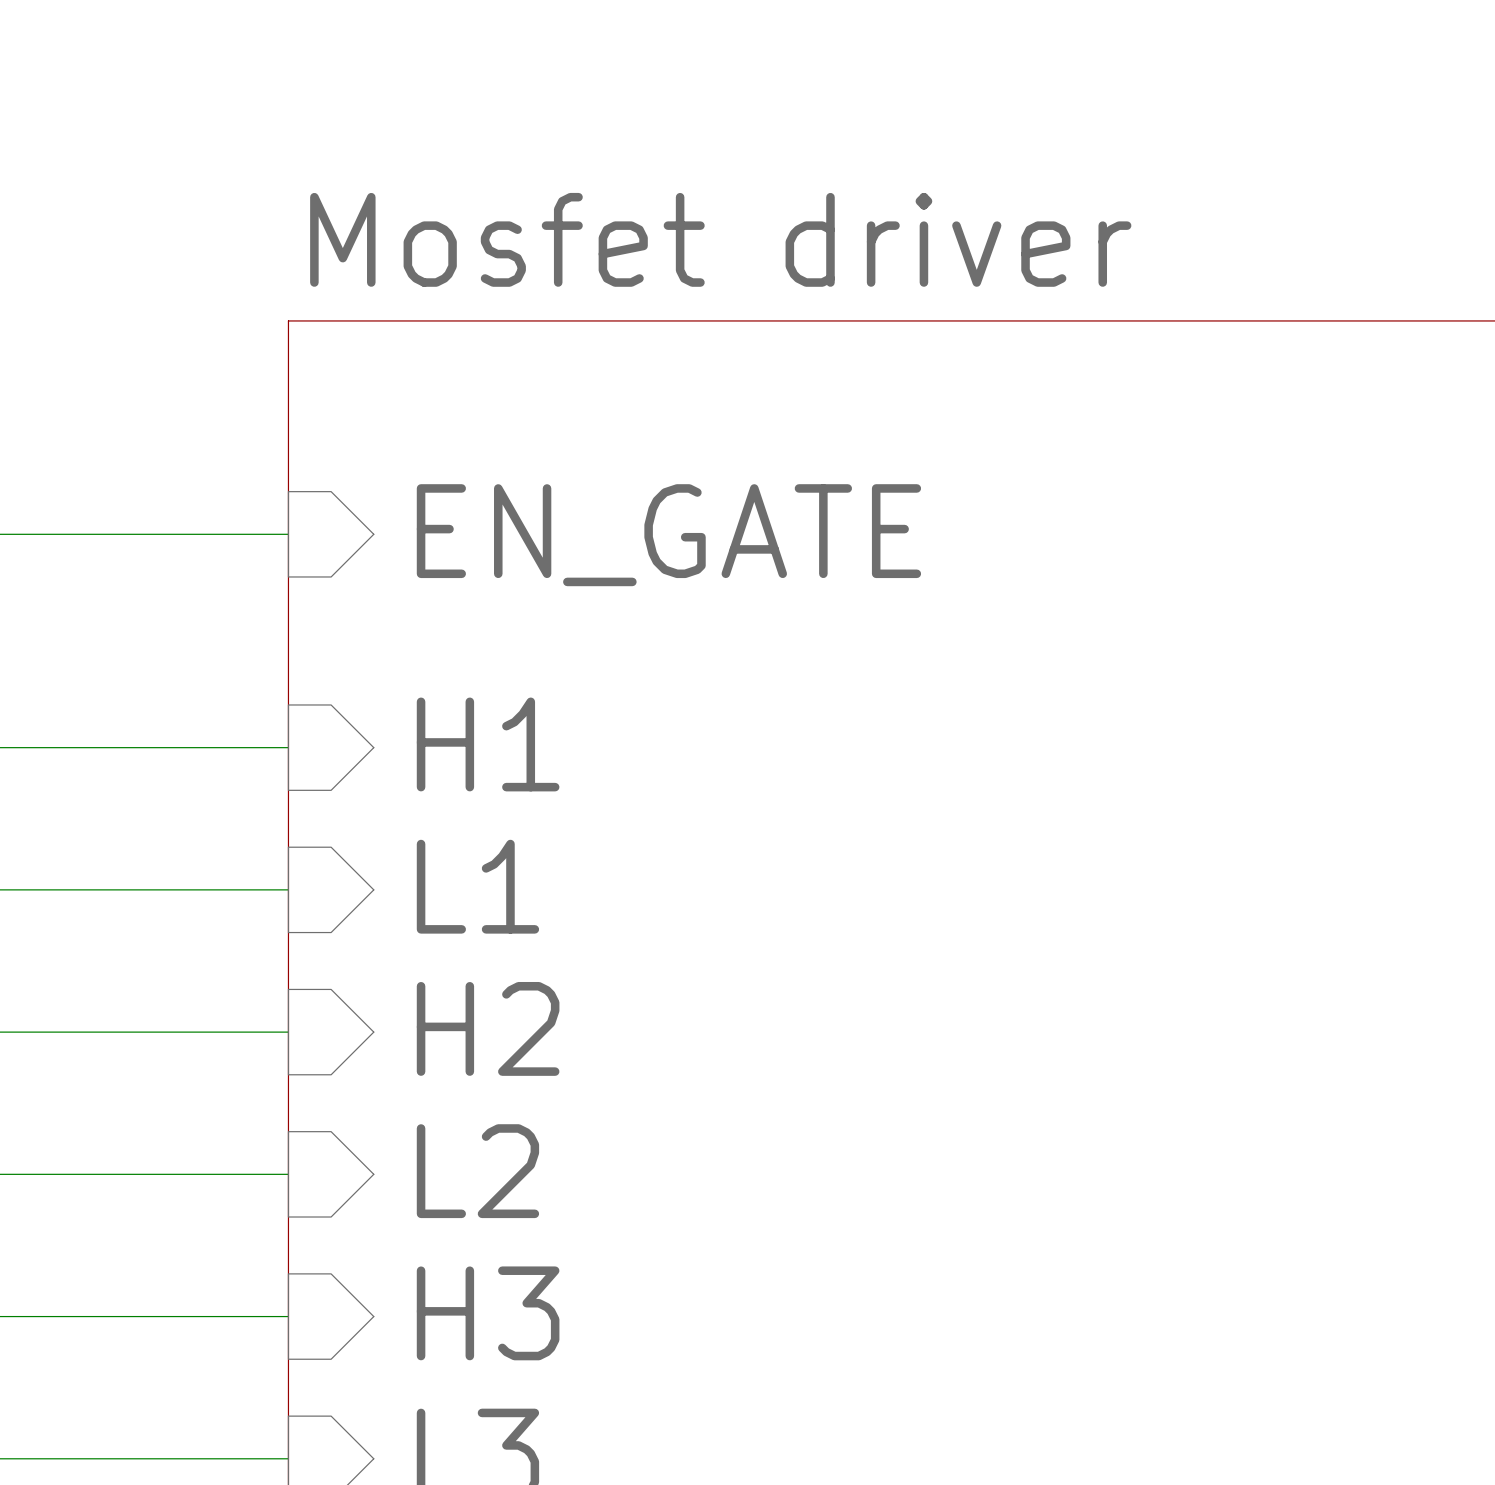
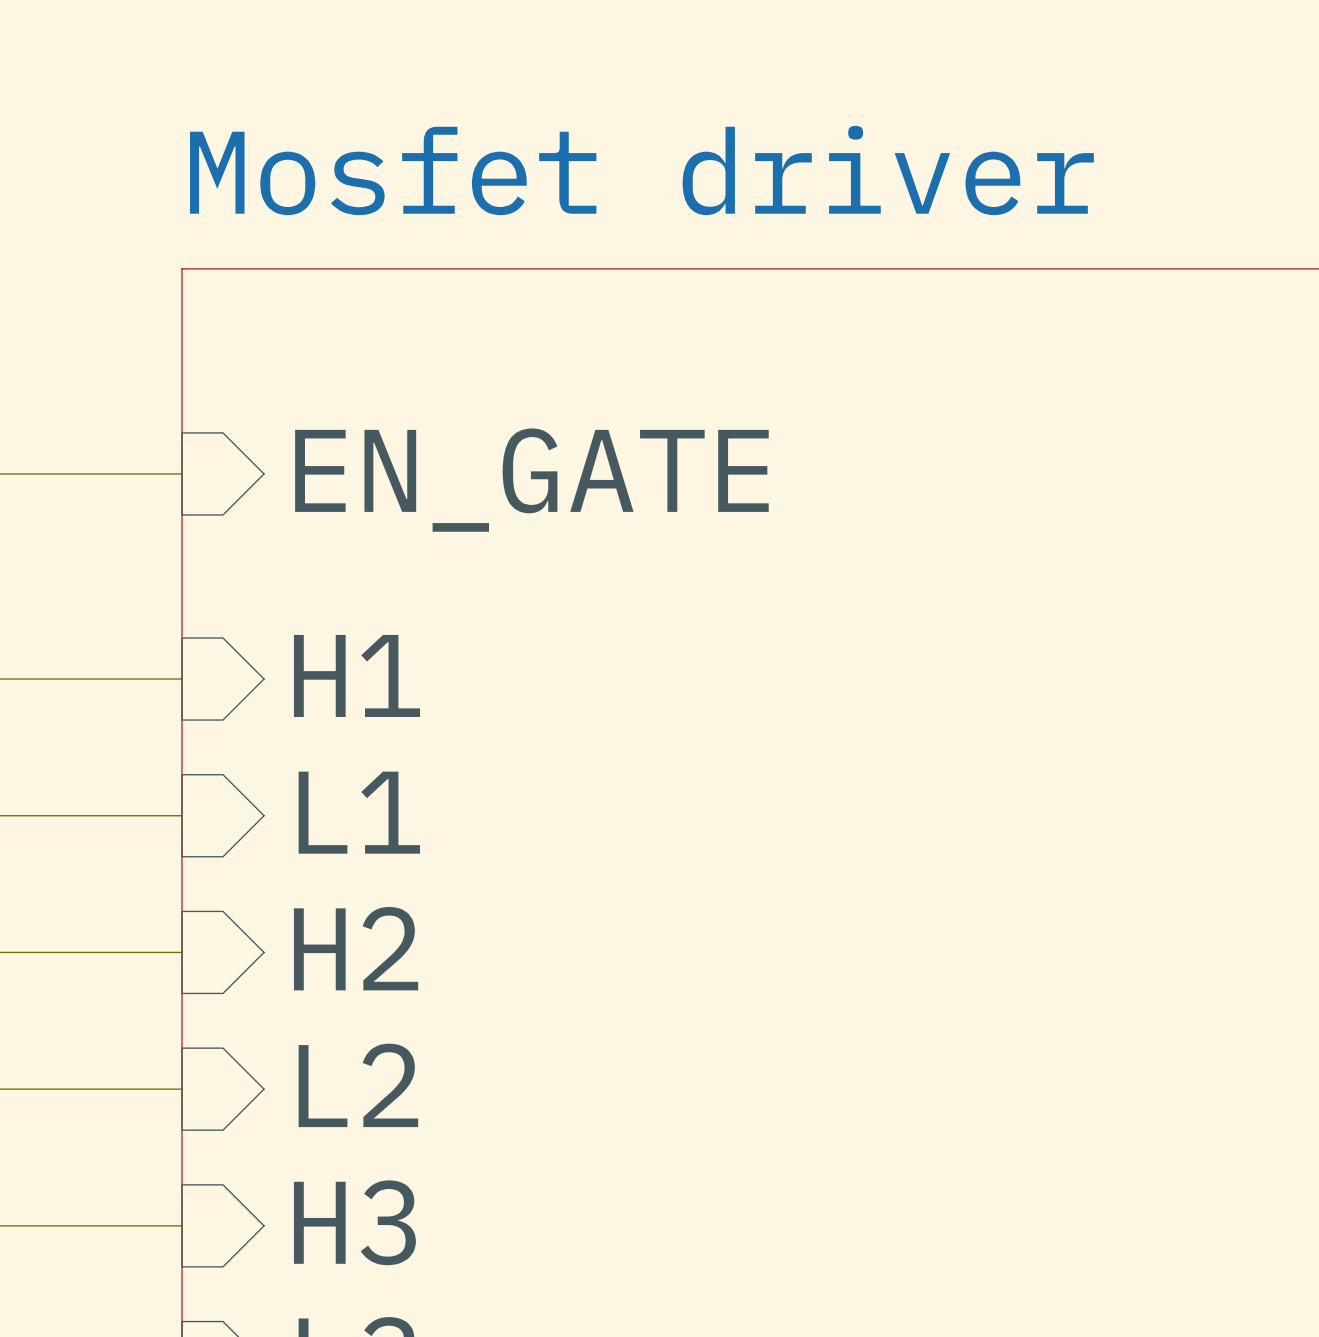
sheet Mosfet driver name position: Mosfet driver (720, 239) -> Mosfet driver (641, 170)

